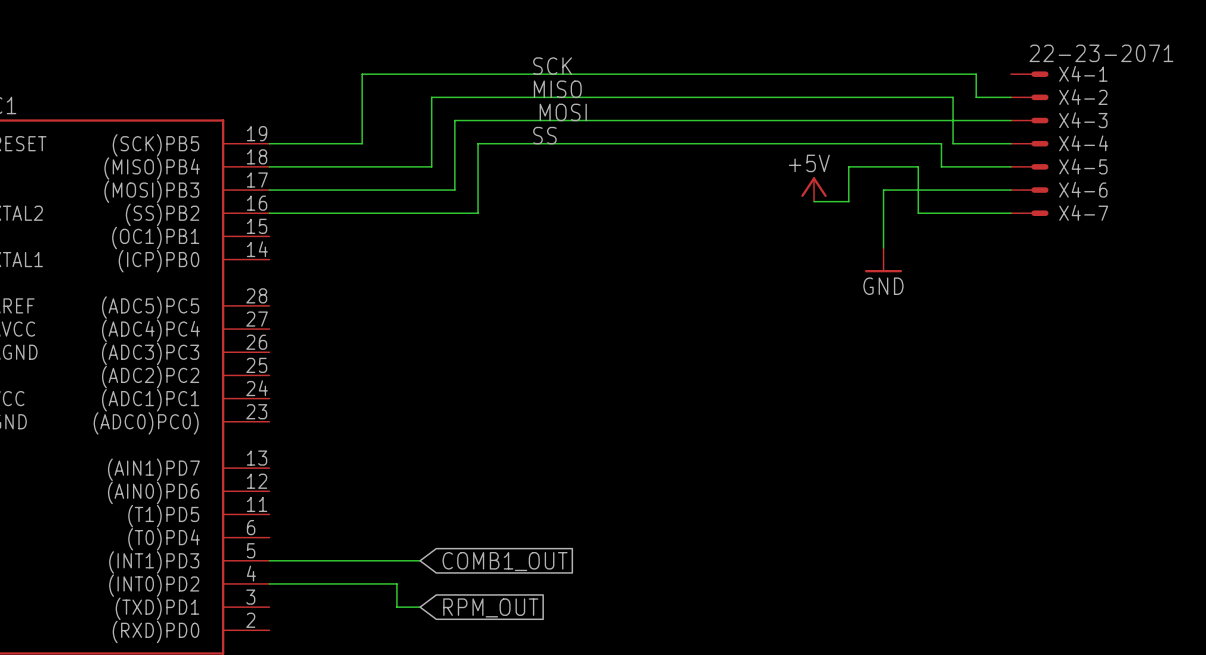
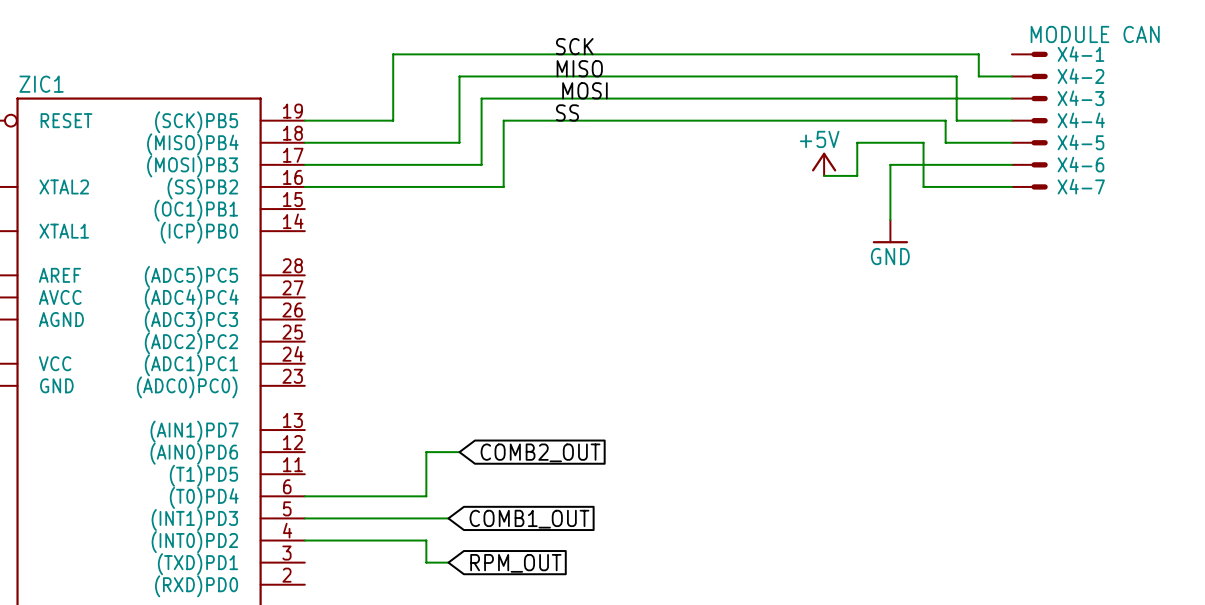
X4-1 value: 22-23-2071 (1101, 53) -> MODULE CAN (1095, 34)
wire: none -> (459, 452) (426, 452) (426, 496) (304, 496)
global label: none -> COMB2_OUT (540, 452)

